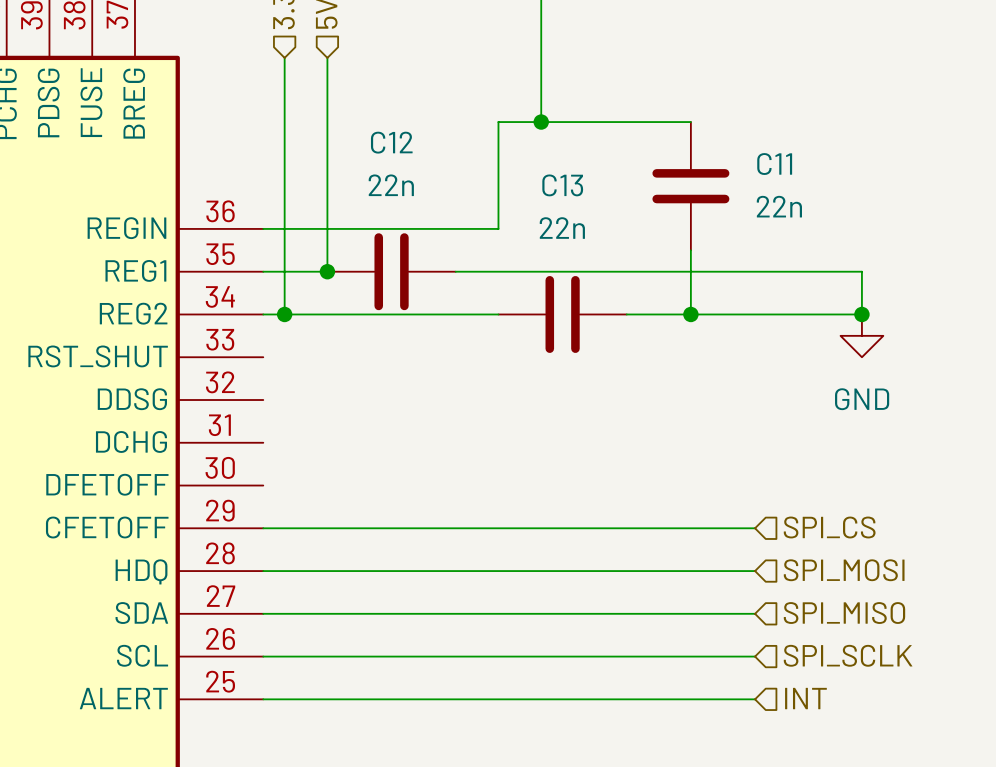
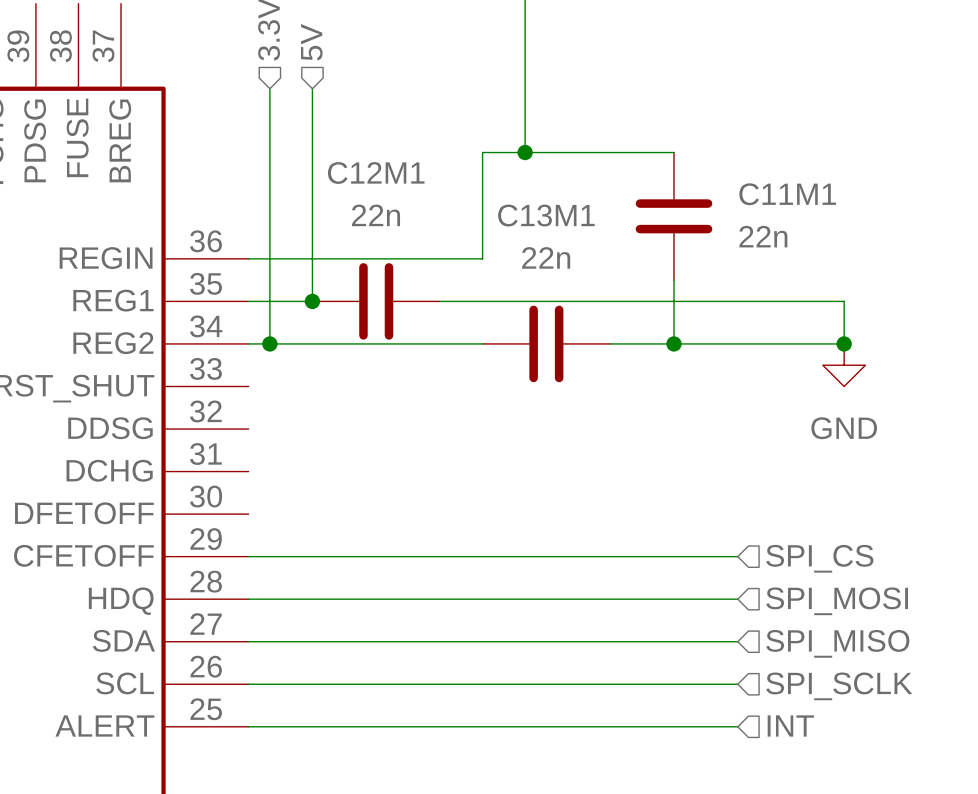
C12 name: C12 (391, 142) -> C12M1 (376, 172)
C11 name: C11 (774, 164) -> C11M1 (787, 194)
C13 name: C13 (562, 185) -> C13M1 (546, 215)

